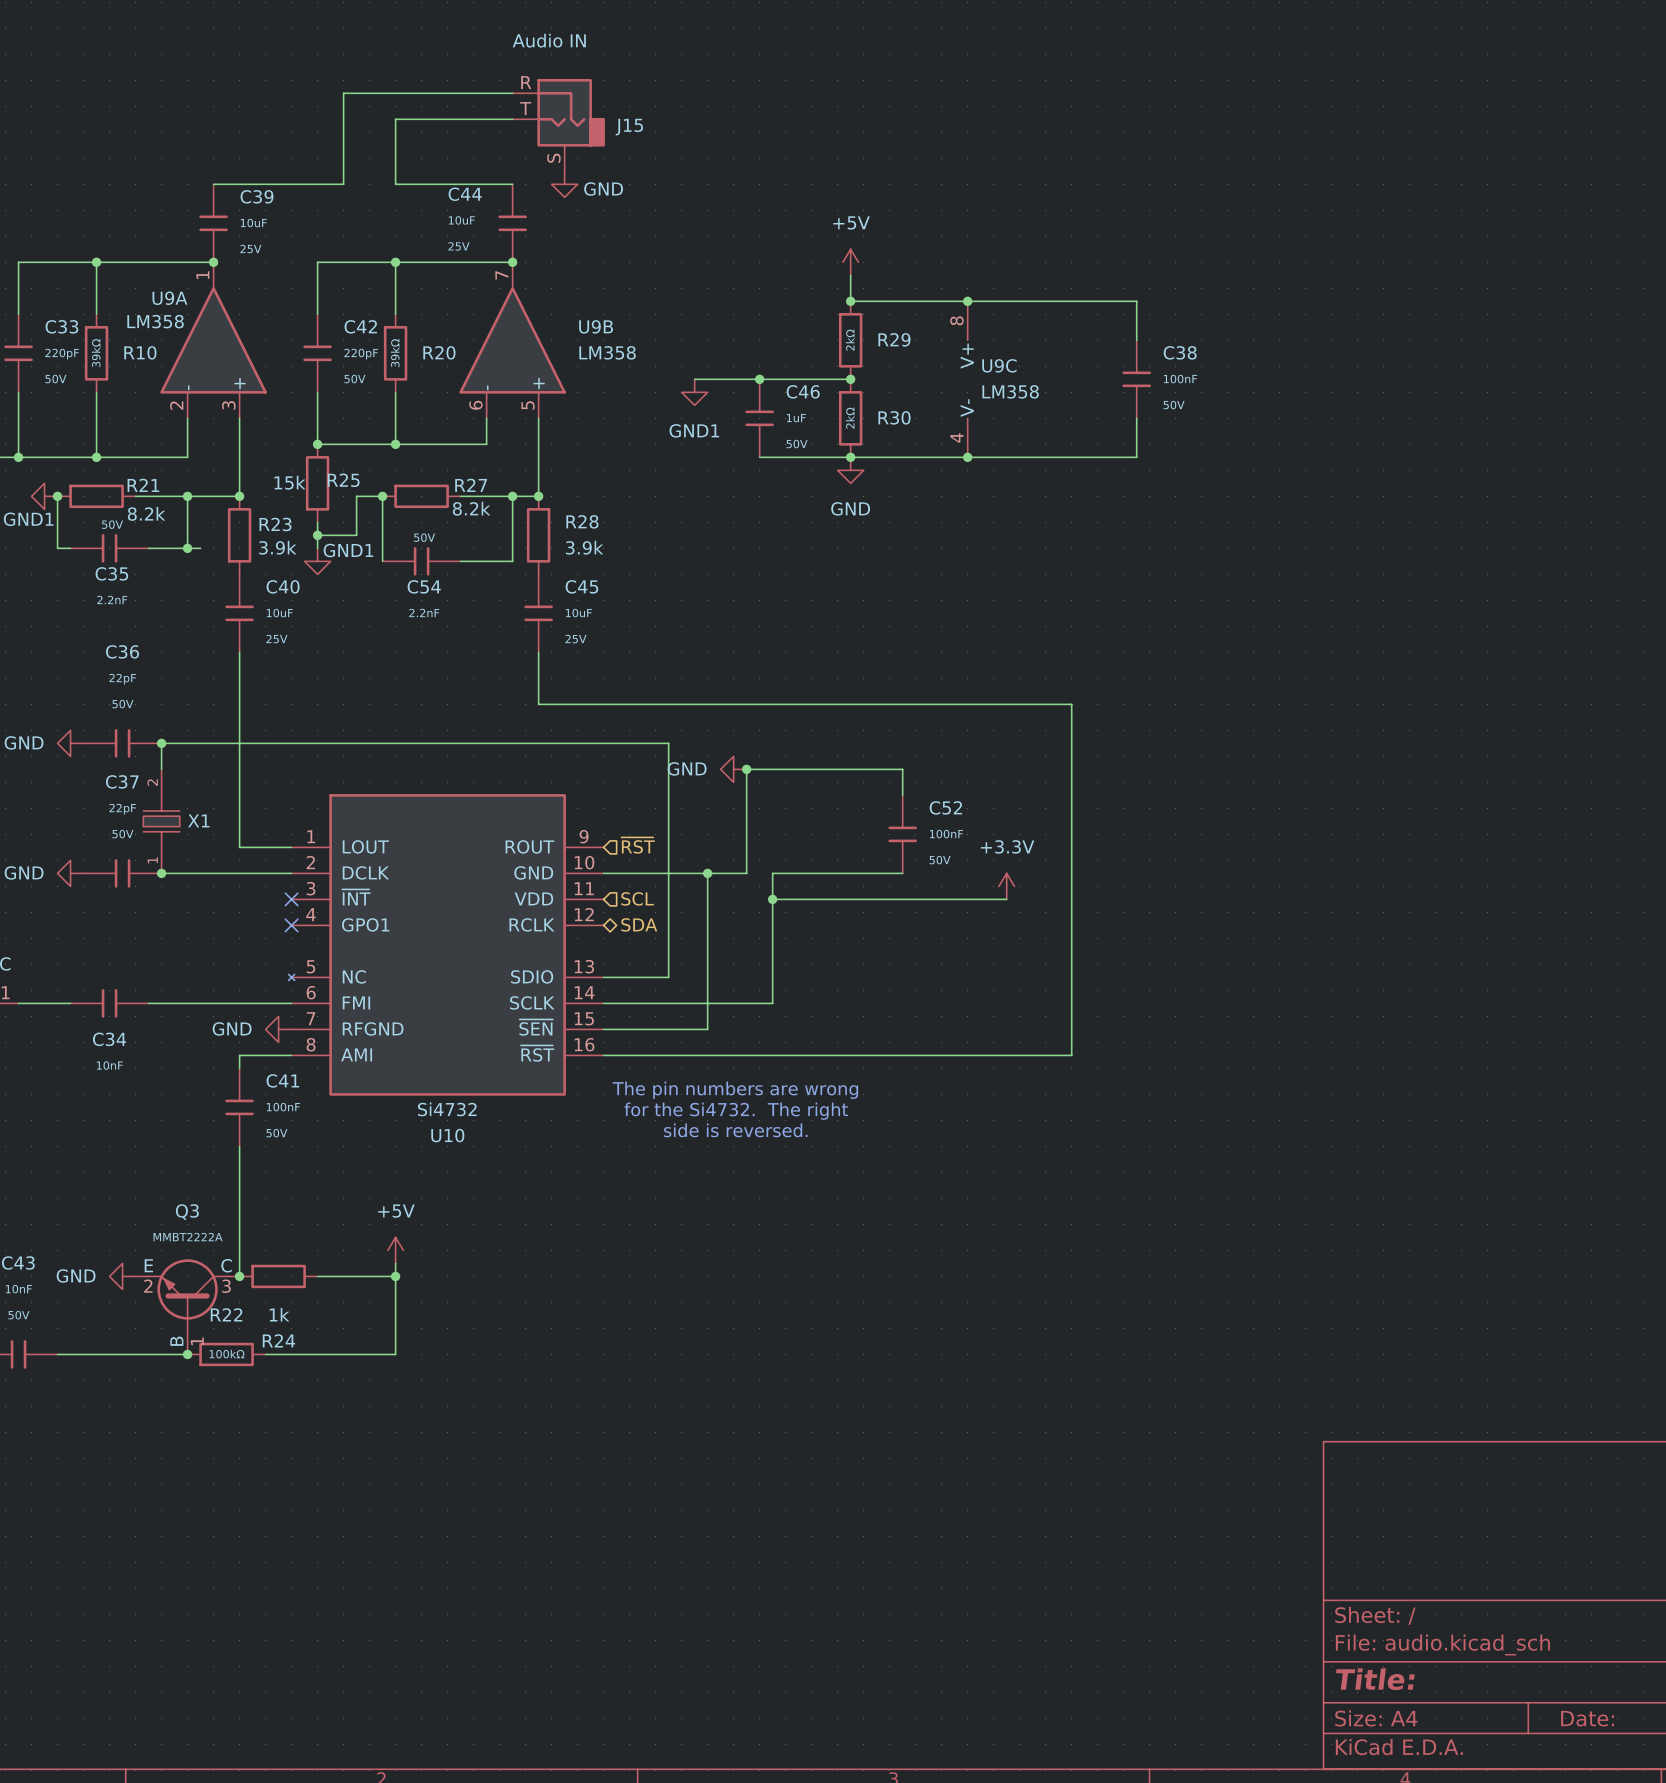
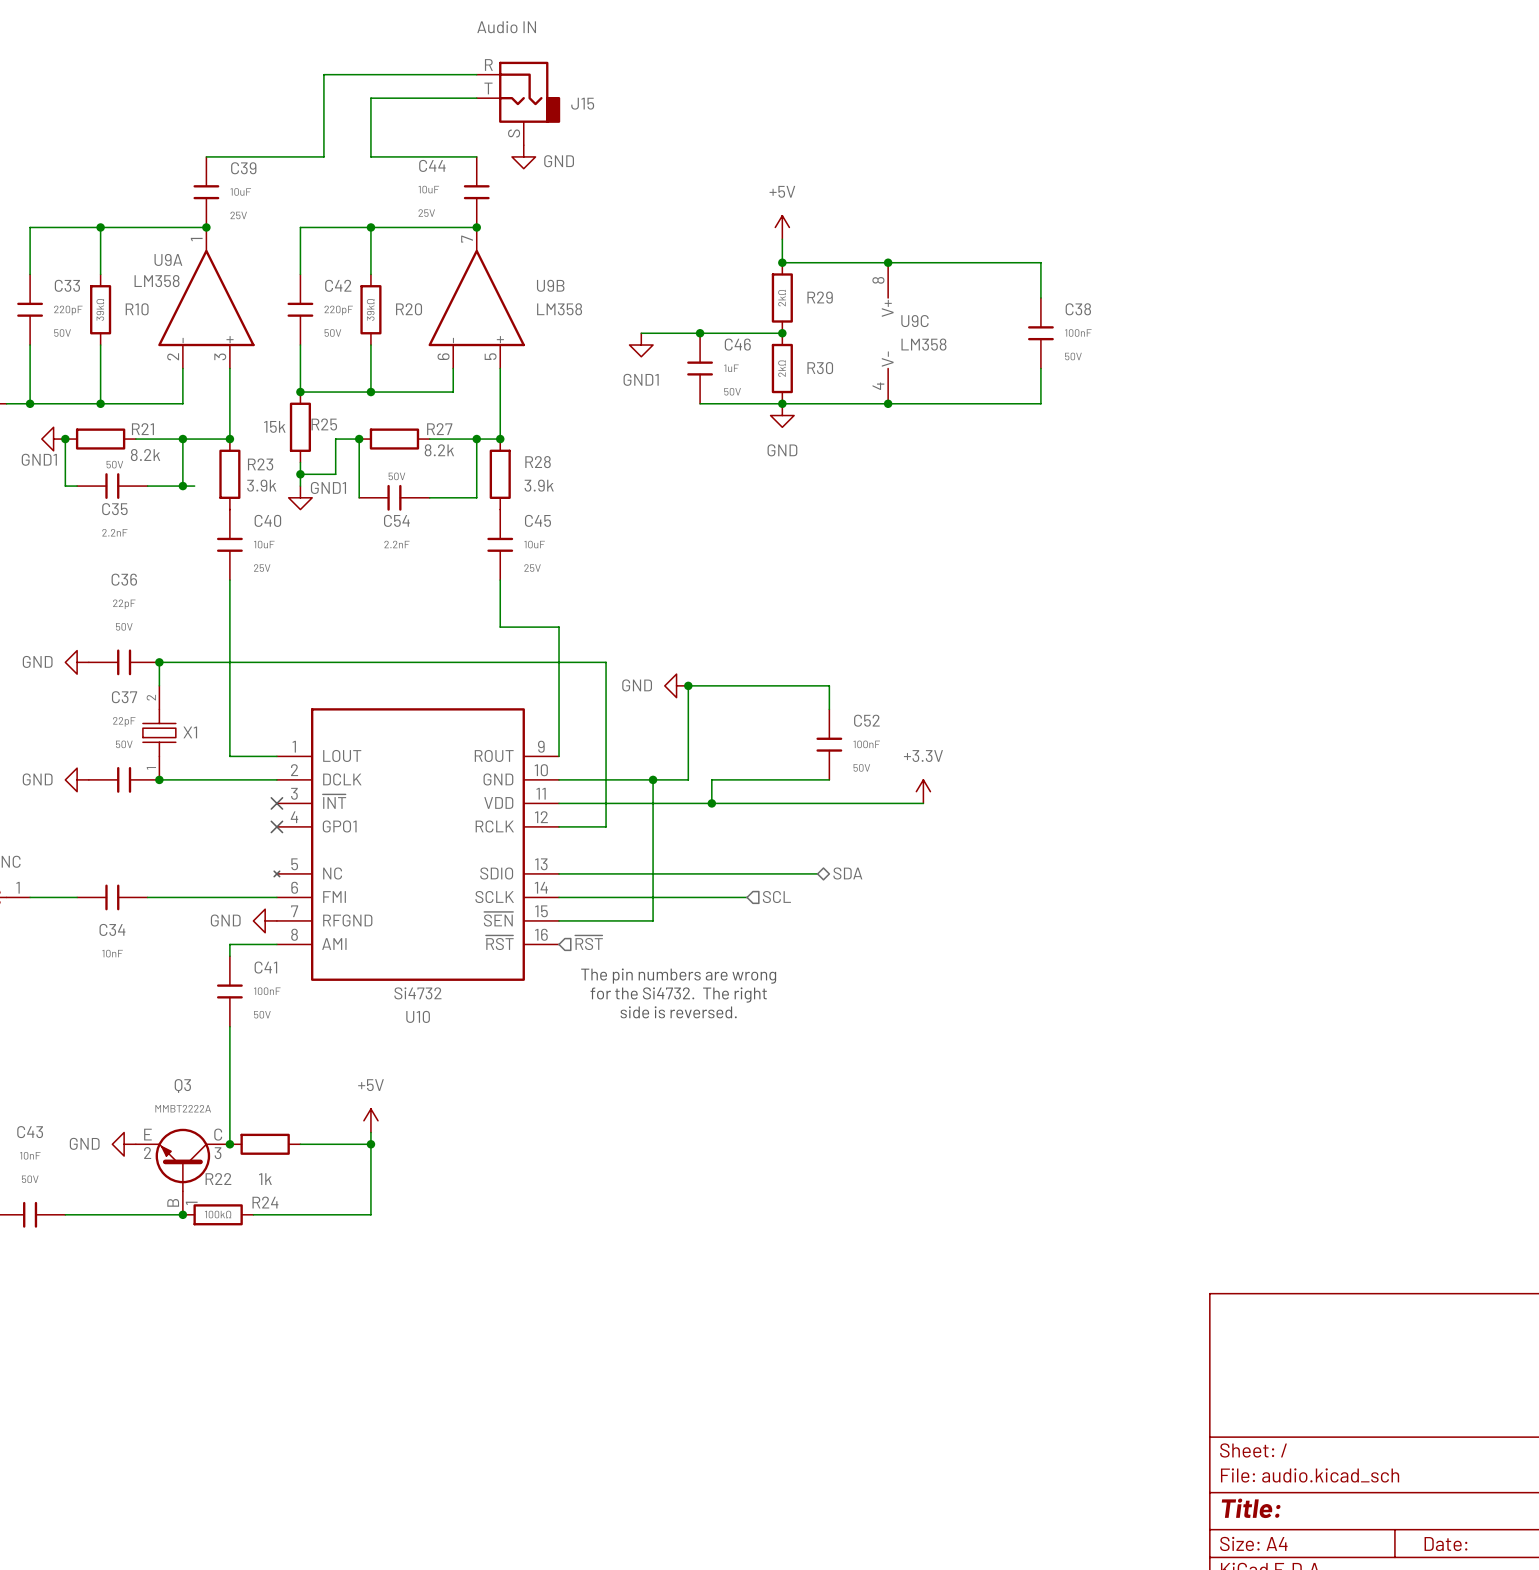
wire: (603, 704) (1071, 704) (1071, 1055) (603, 1055) -> (559, 627) (559, 756)
wire: (655, 743) (668, 743) (668, 977) -> (606, 662) (606, 826) (559, 826)
hierarchical label position: ~{RST} (638, 845) -> ~{RST} (588, 942)
hierarchical label position: SCL (637, 898) -> SCL (776, 897)
wire: none -> (559, 803) (711, 803)
wire: (772, 899) (772, 1003) -> (747, 897) (711, 897)
hierarchical label: SDA (639, 924) -> none
hierarchical label: none -> SDA (847, 873)
wire: none -> (617, 873) (817, 873)

